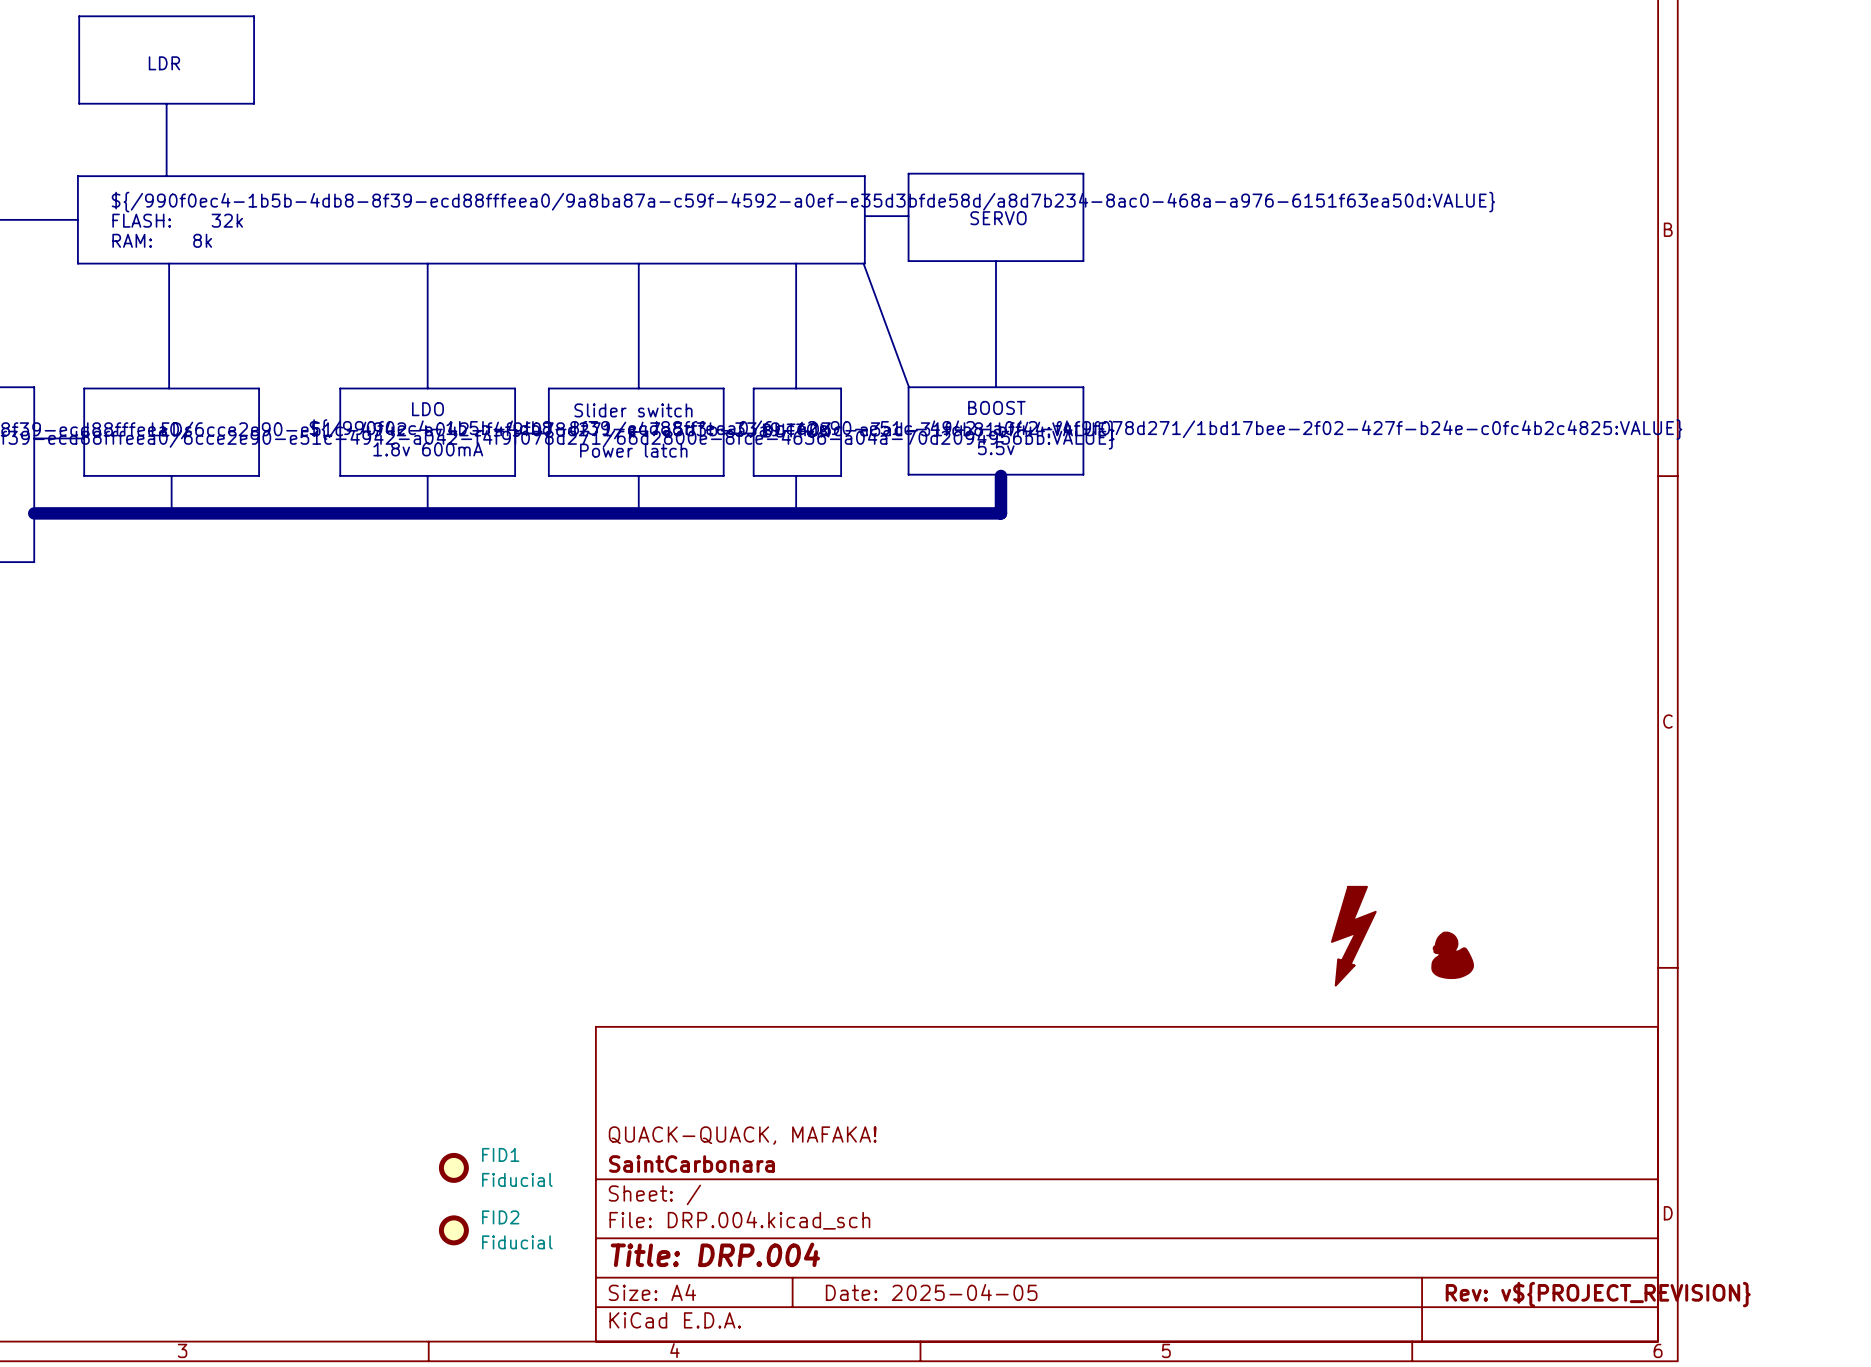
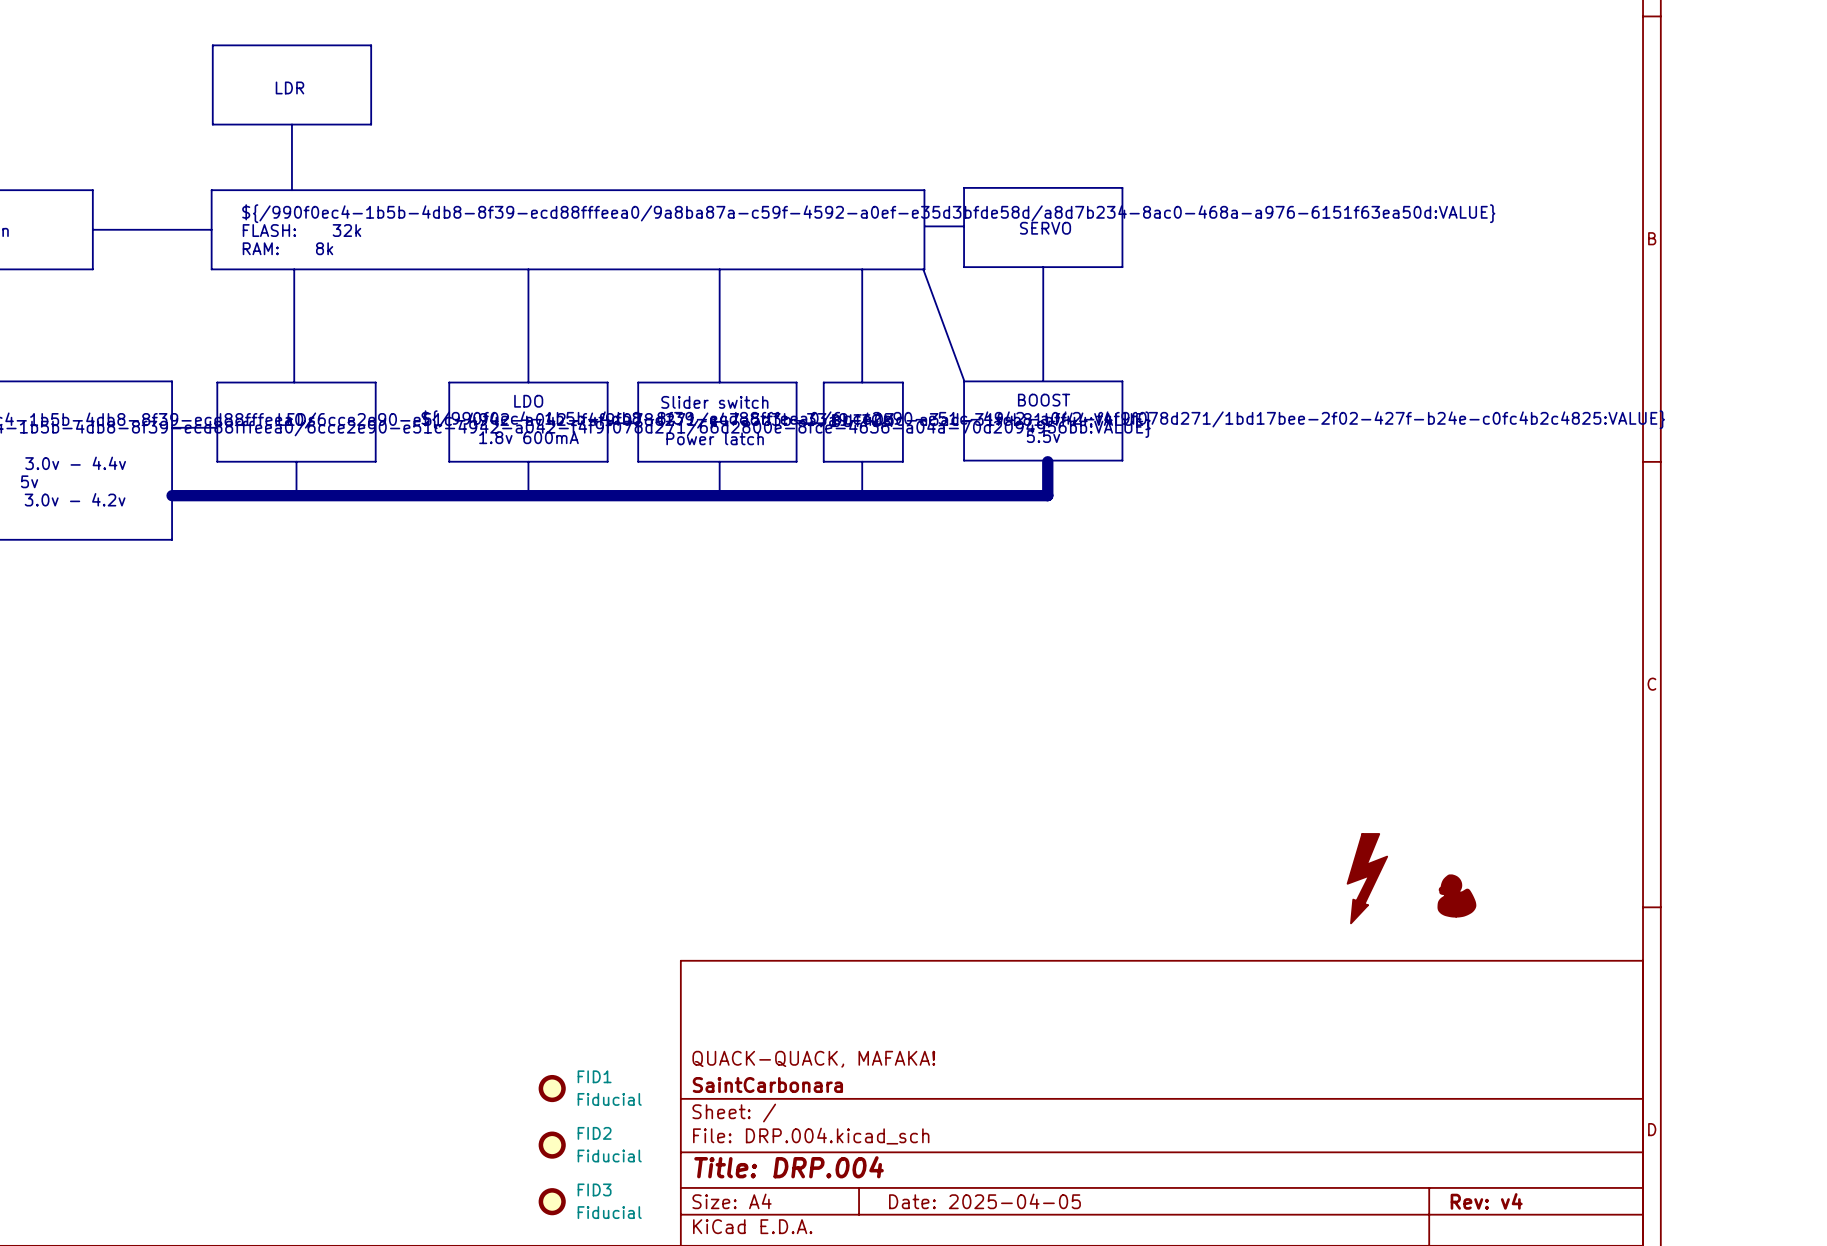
FID3: none -> Fiducial (552, 1201)
title block: Rev: v${PROJECT_REVISION} (1598, 1294) -> Rev: v4 (1486, 1201)

